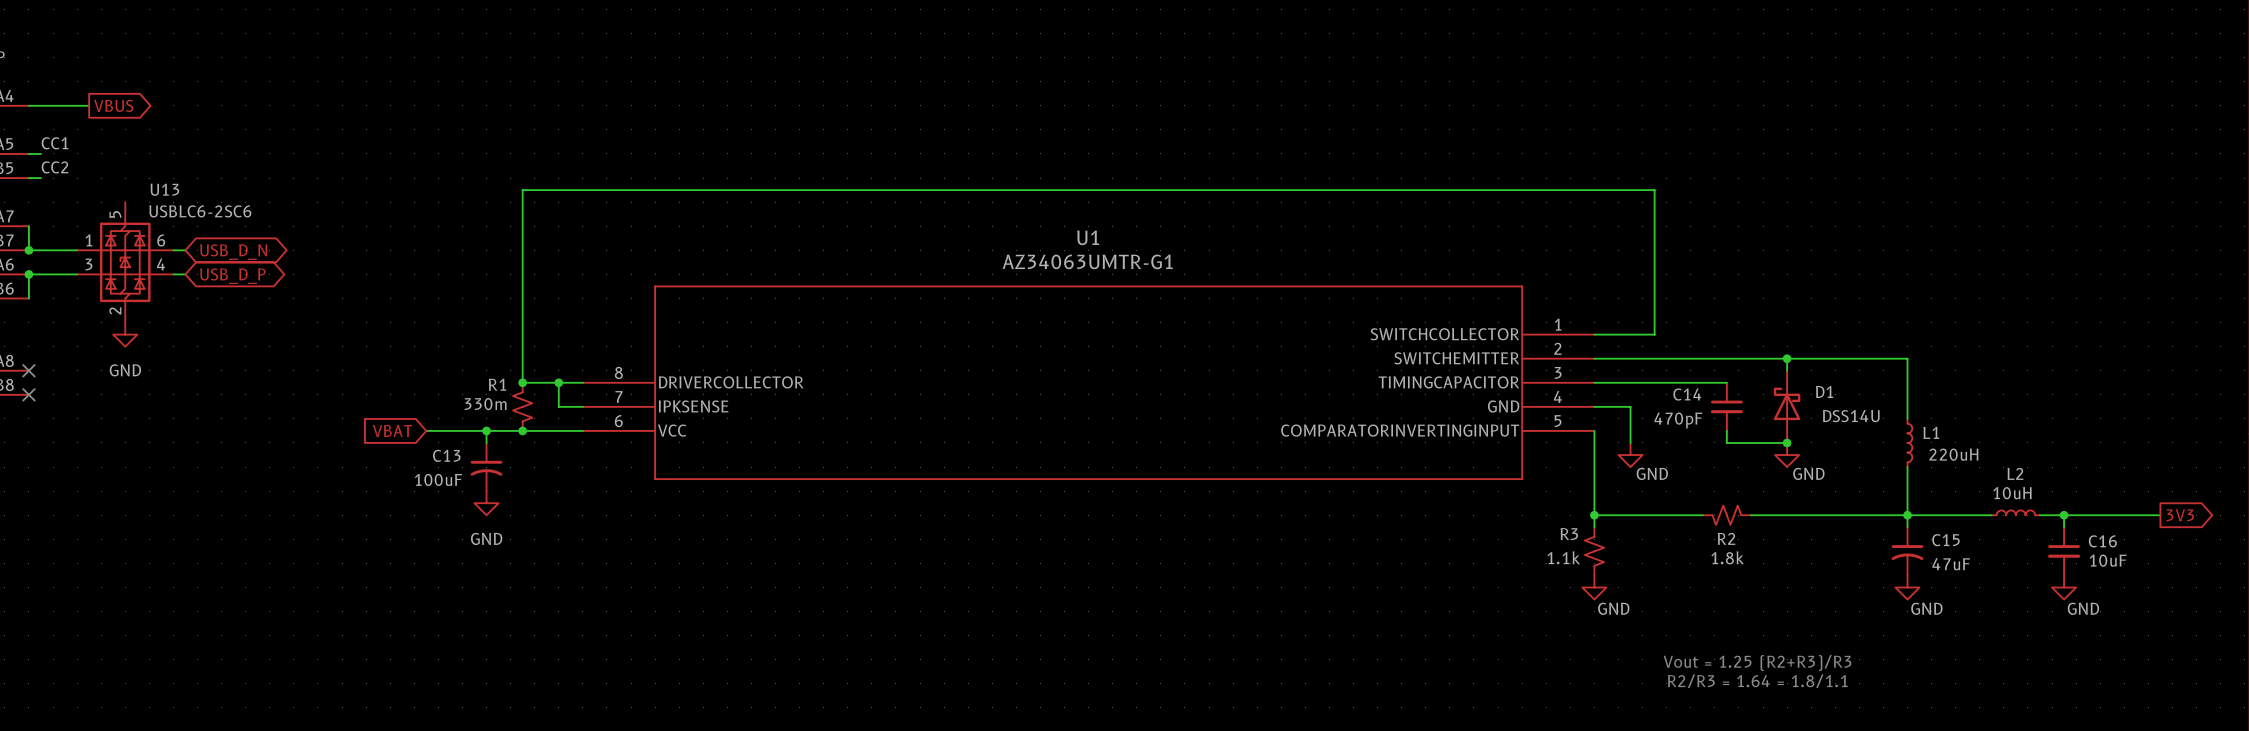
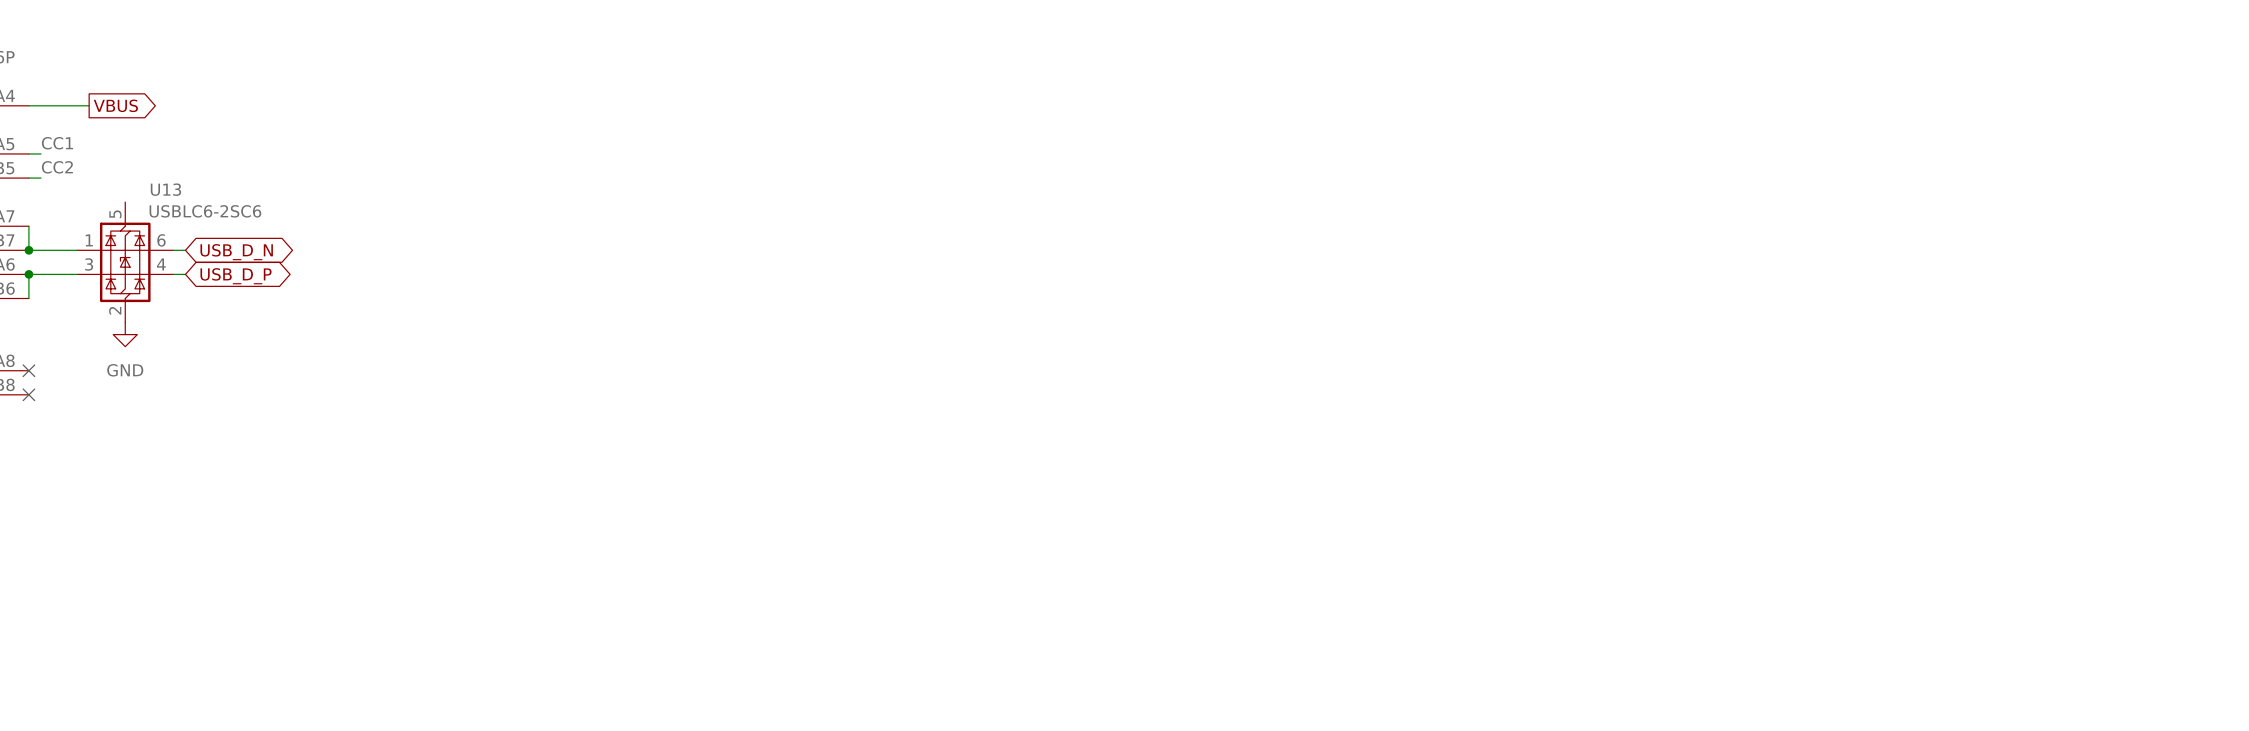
wire: (1594, 334) (1654, 334) (1654, 190) (522, 190) (522, 382) (582, 382) -> none
wire: (1594, 358) (1907, 358) (1907, 418) -> none
wire: (1787, 358) (1787, 370) -> none
junction: (1787, 358) -> none
junction: (522, 382) -> none
wire: (558, 382) (558, 406) (582, 406) -> none
junction: (558, 382) -> none
U1: AZ34063UMTR-G1 (1088, 382) -> none
wire: (1594, 382) (1726, 382) -> none
R1: 330m (522, 406) -> none
wire: (1594, 406) (1630, 406) (1630, 442) -> none
C14: 470pF (1726, 406) -> none
D1: DSS14U (1787, 406) -> none
wire: (426, 430) (582, 430) -> none
wire: (486, 430) (486, 442) -> none
junction: (486, 430) -> none
junction: (522, 430) -> none
wire: (1594, 430) (1594, 527) -> none
wire: (1726, 430) (1726, 442) (1787, 442) -> none
global label: VBAT (392, 431) -> none
junction: (1787, 442) -> none
L1: 220uH (1909, 442) -> none
power symbol: GND (1630, 455) -> none
power symbol: GND (1787, 455) -> none
C13: 100uF (486, 467) -> none
wire: (1907, 467) (1907, 527) -> none
power symbol: GND (486, 503) -> none
L2: 10uH (2015, 512) -> none
wire: (1594, 515) (1702, 515) -> none
junction: (1594, 515) -> none
R2: 1.8k (1726, 515) -> none
wire: (1750, 515) (1991, 515) -> none
junction: (1907, 515) -> none
wire: (2039, 515) (2160, 515) -> none
wire: (2064, 515) (2064, 527) -> none
junction: (2064, 515) -> none
global label: 3V3 (2180, 515) -> none
R3: 1.1k (1594, 551) -> none
C15: 47uF (1907, 551) -> none
C16: 10uF (2064, 551) -> none
power symbol: GND (1594, 587) -> none
power symbol: GND (1907, 587) -> none
power symbol: GND (2064, 587) -> none
text: Vout = 1.25 (R2+R3)/R3 (1757, 663) -> none
text: R2/R3 = 1.64 = 1.8/1.1 (1757, 681) -> none

